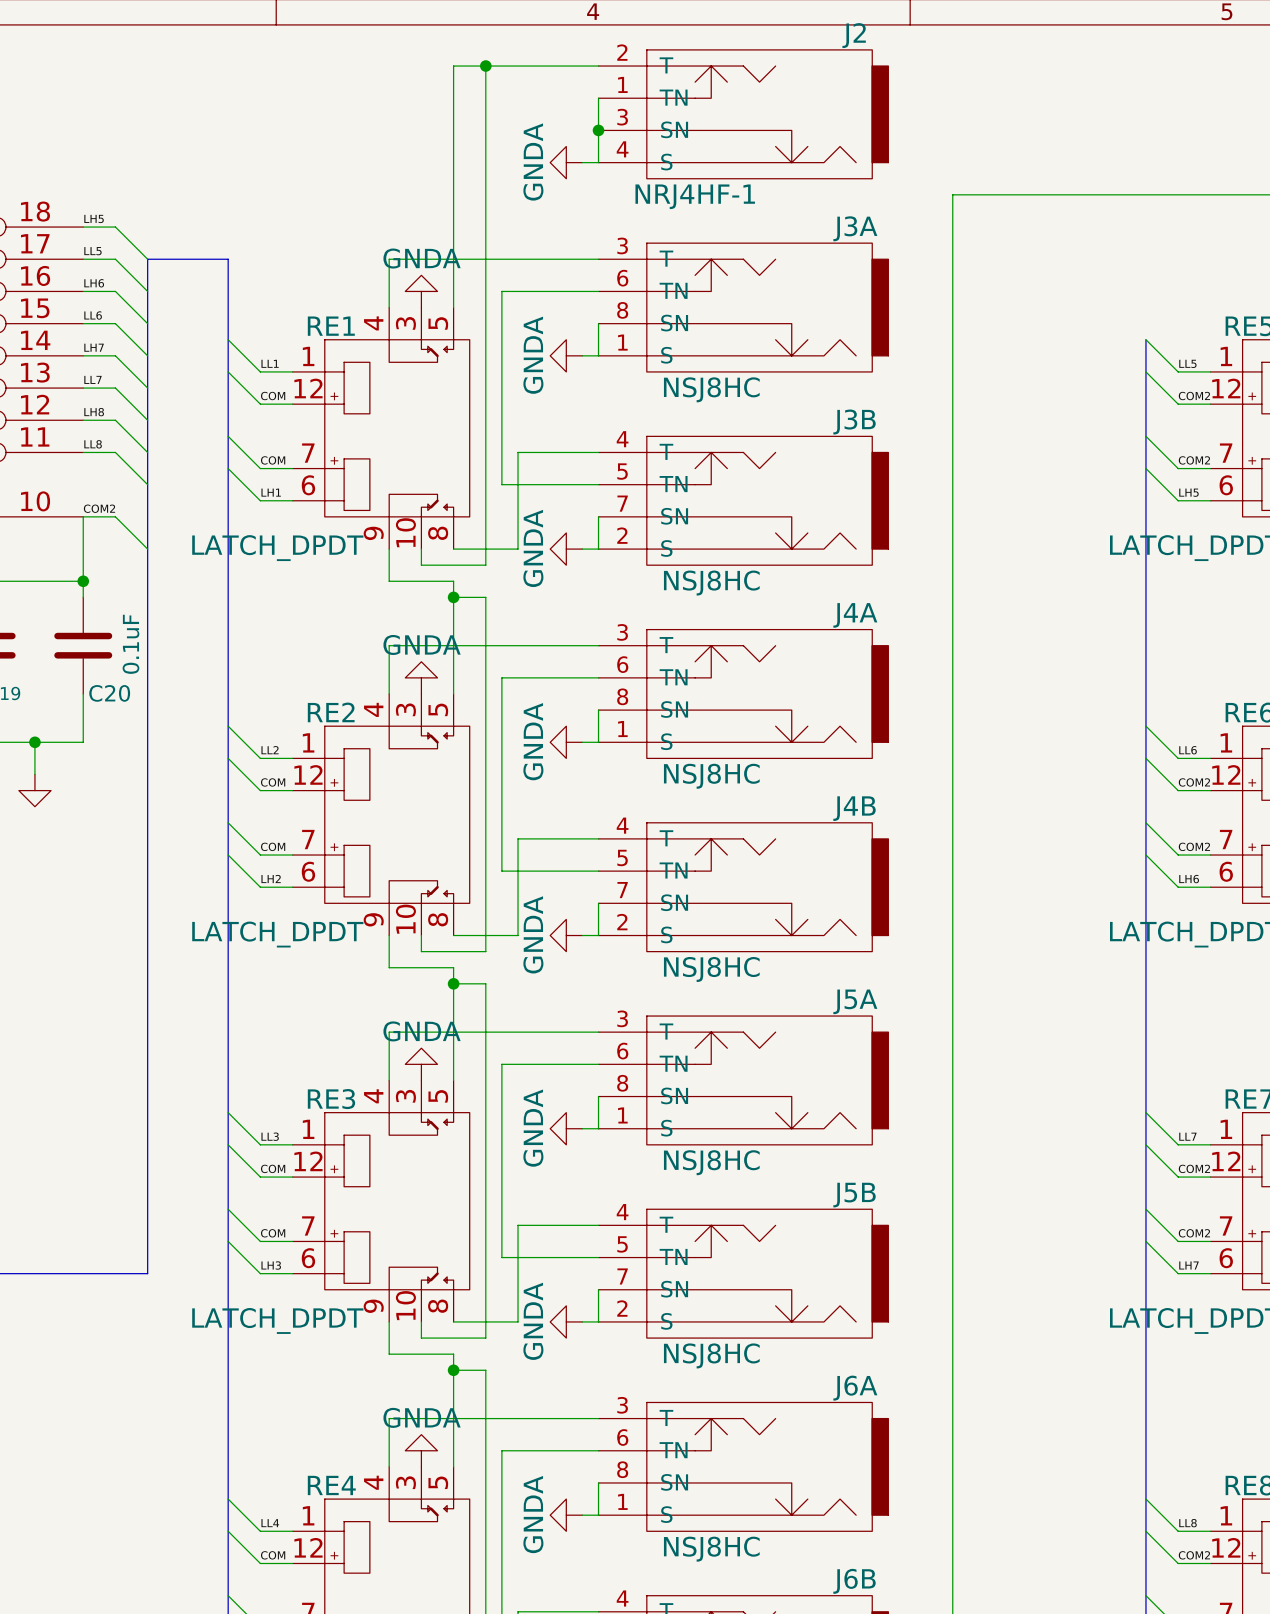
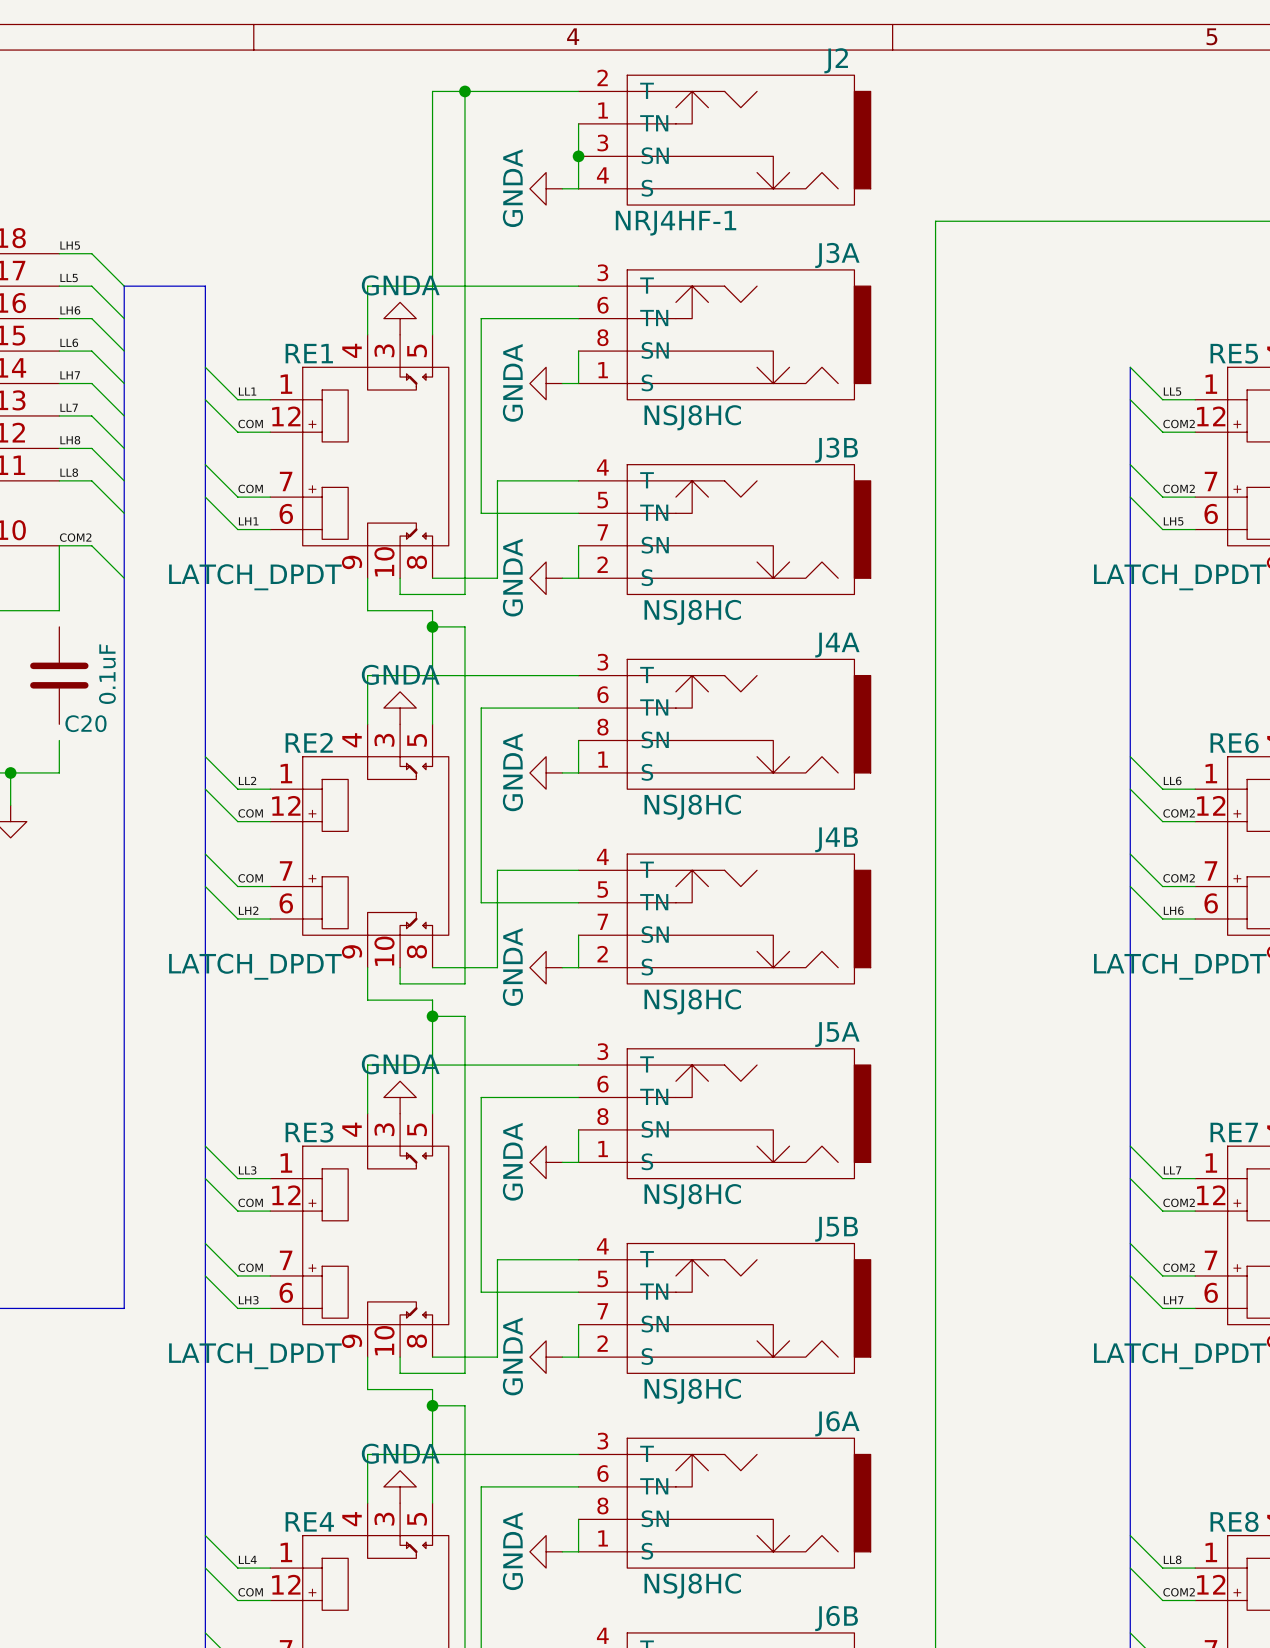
wire: (83, 581) (83, 597) -> none
junction: (83, 581) -> none
wire: (83, 693) (83, 710) -> none

